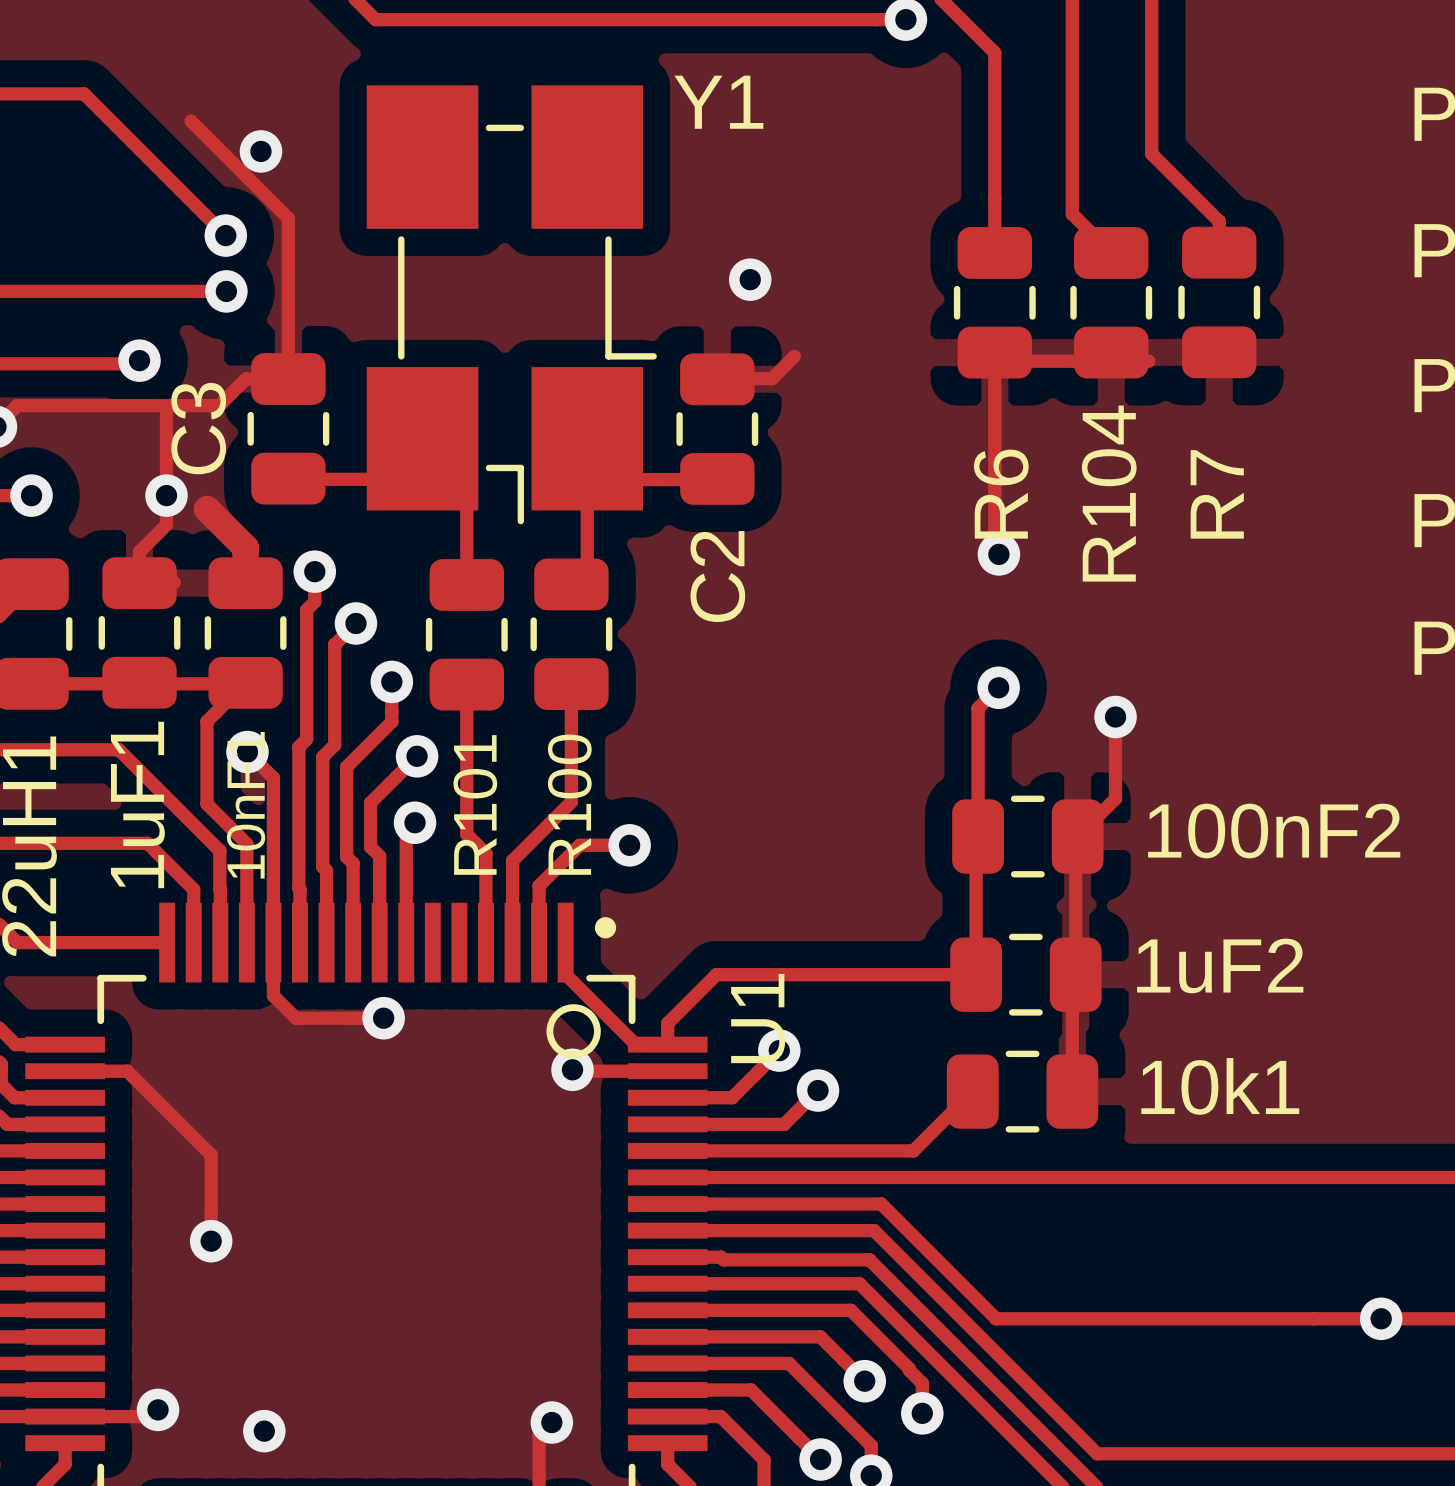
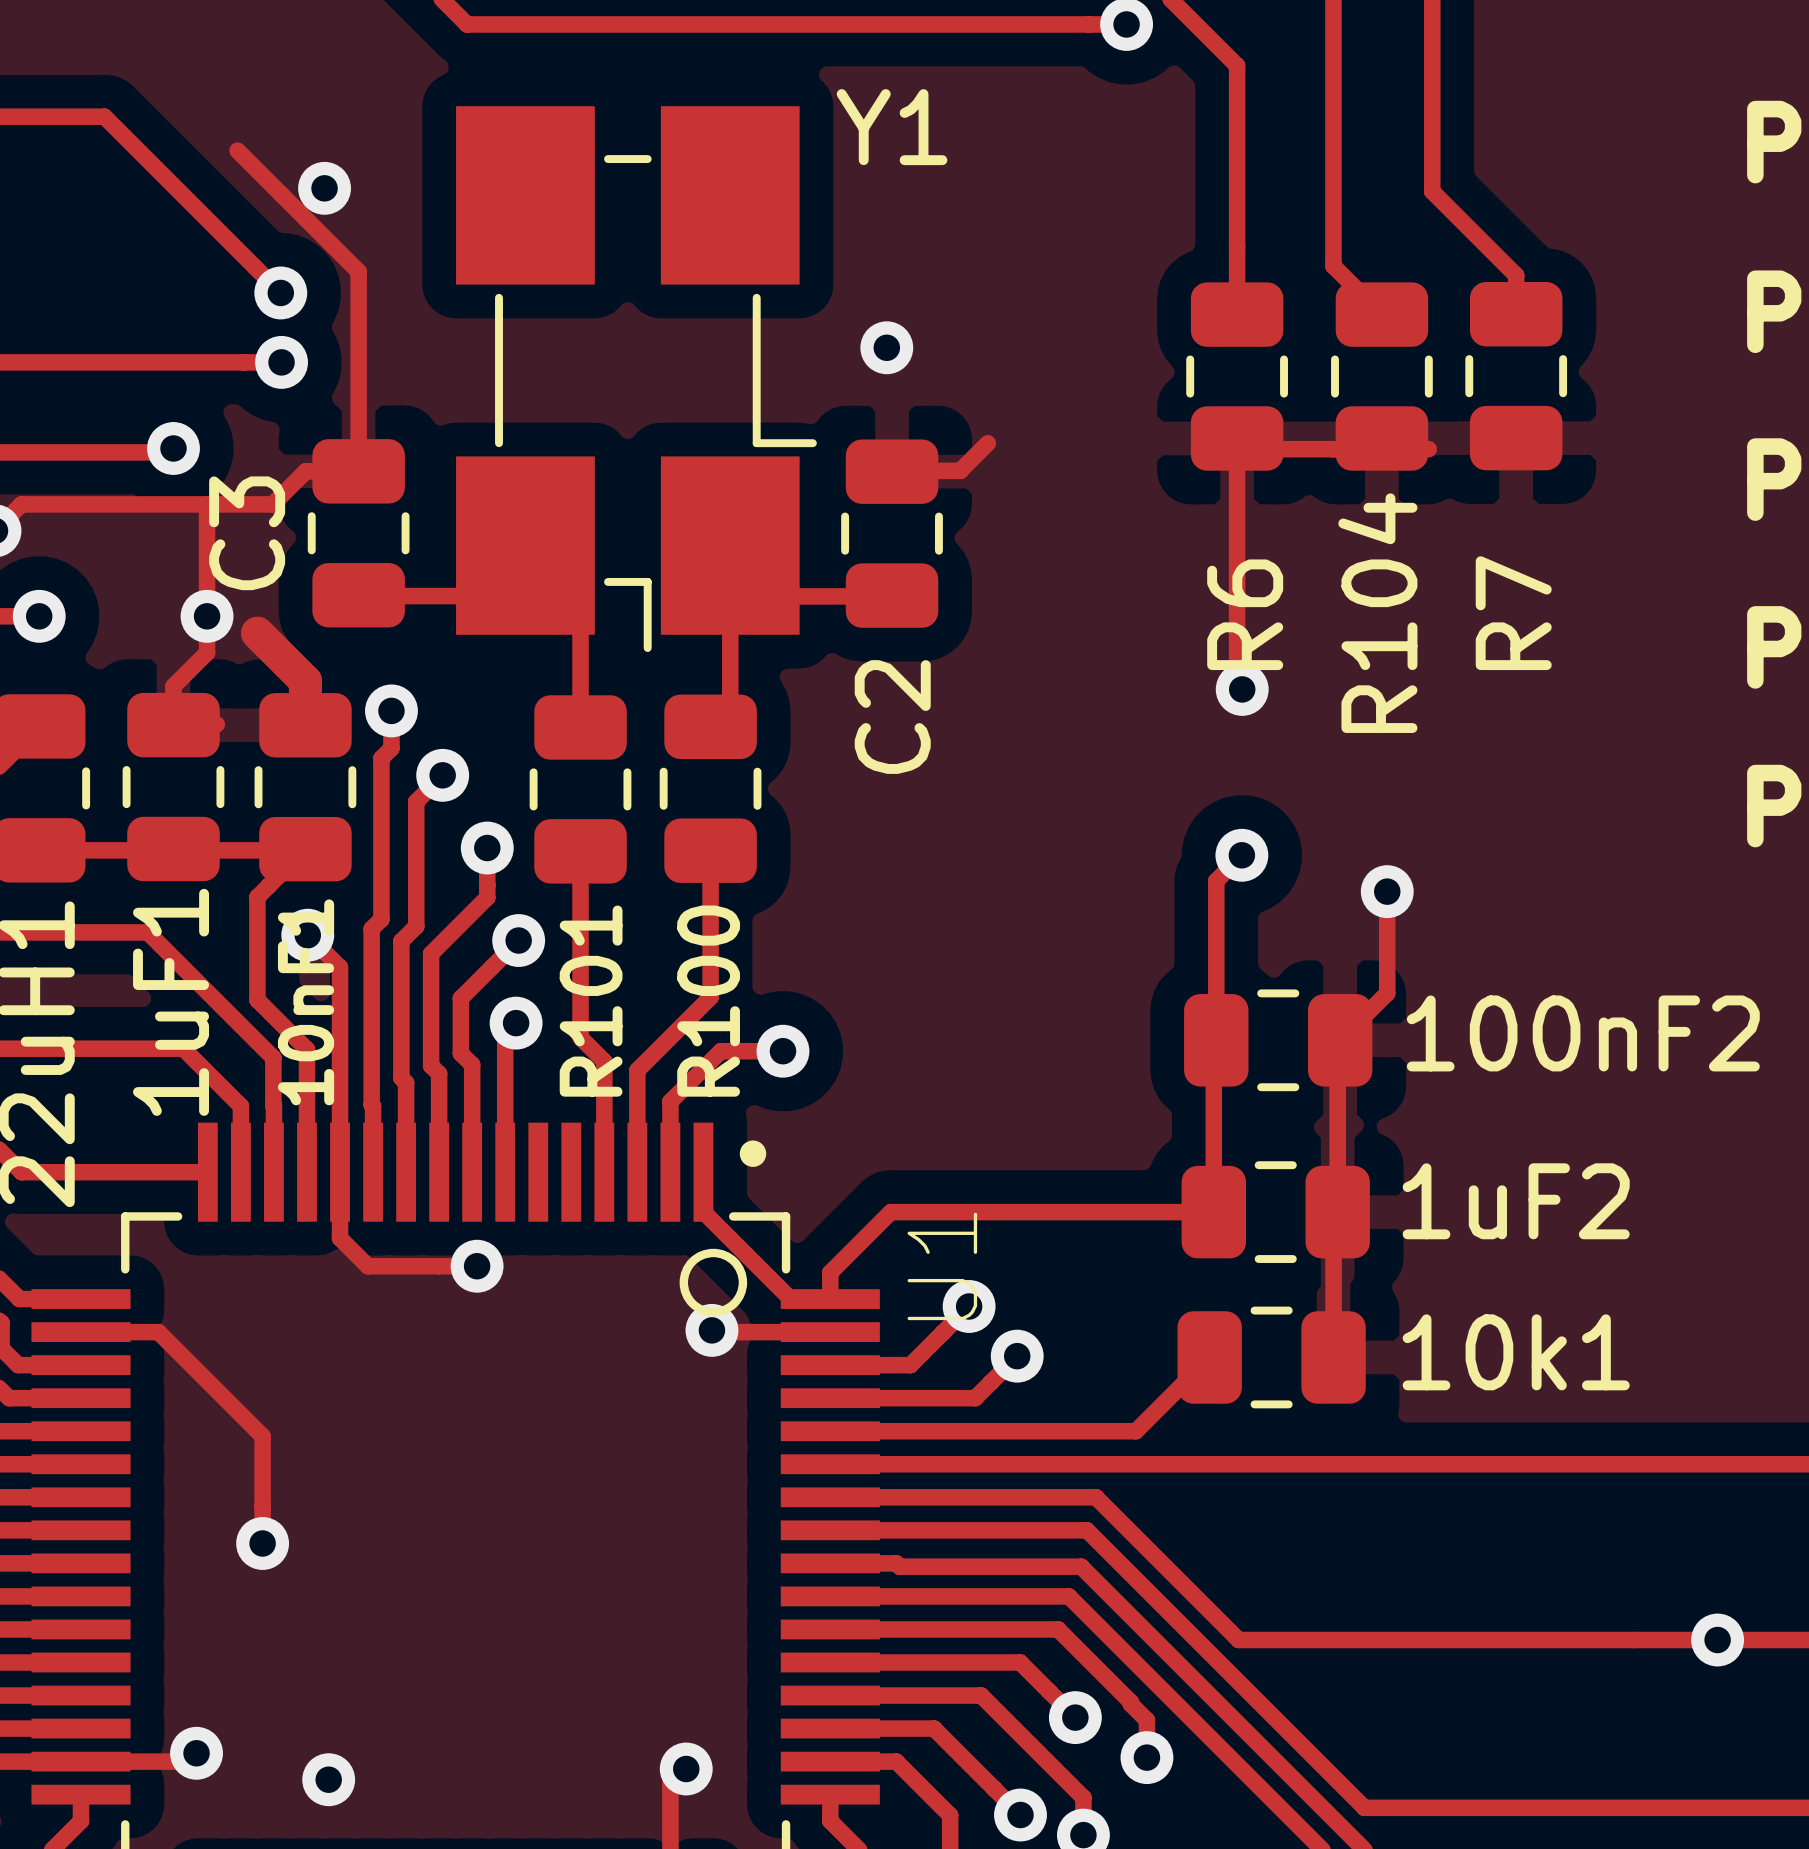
via position: (750, 279) -> (886, 347)

